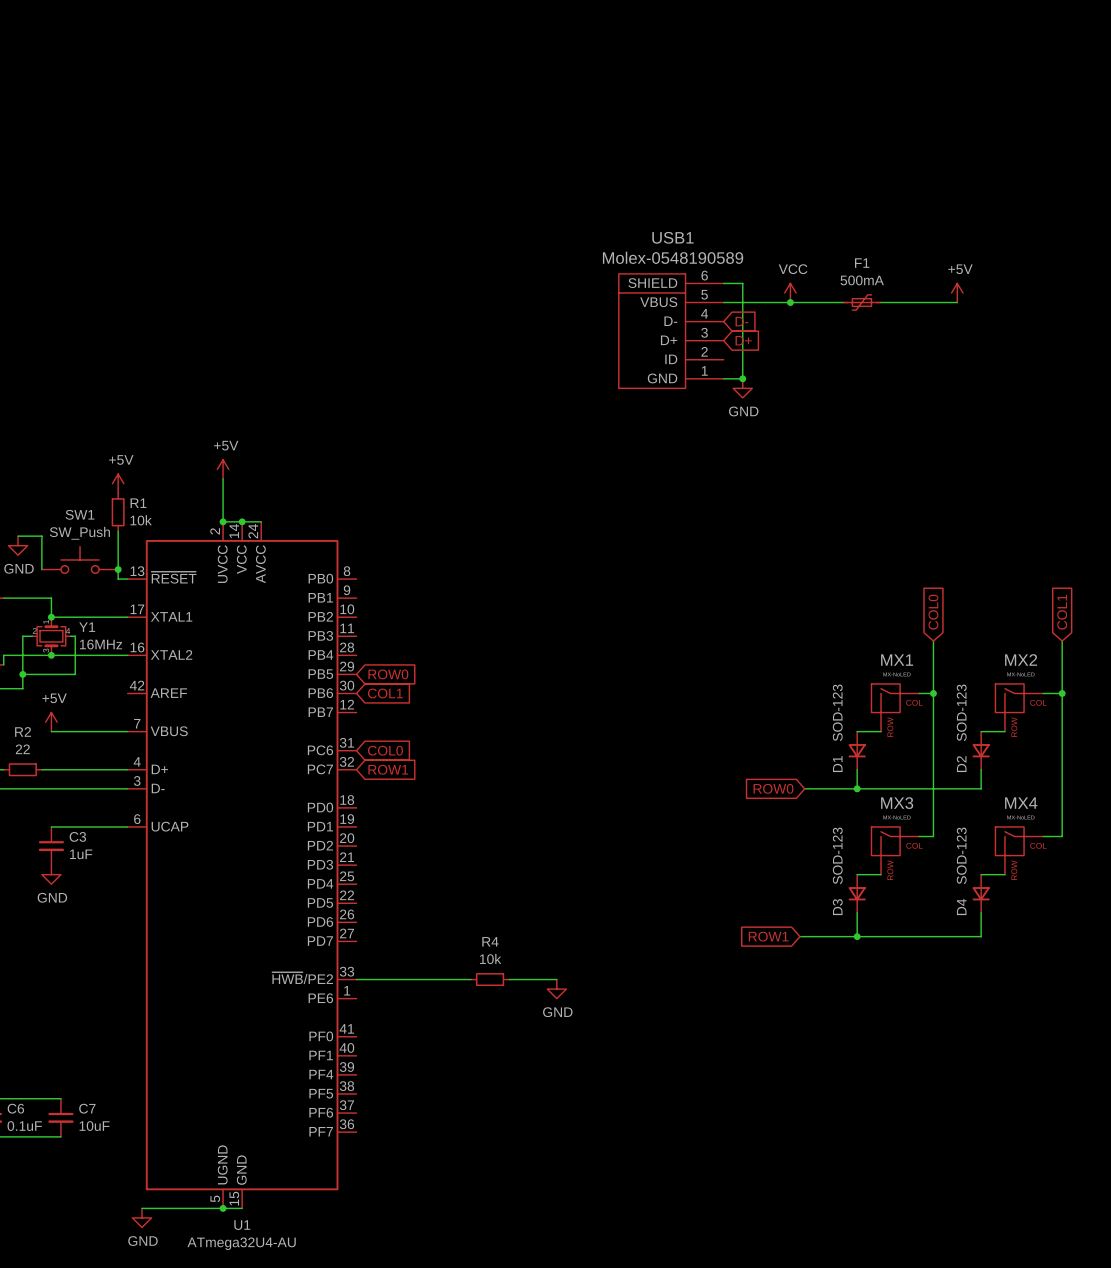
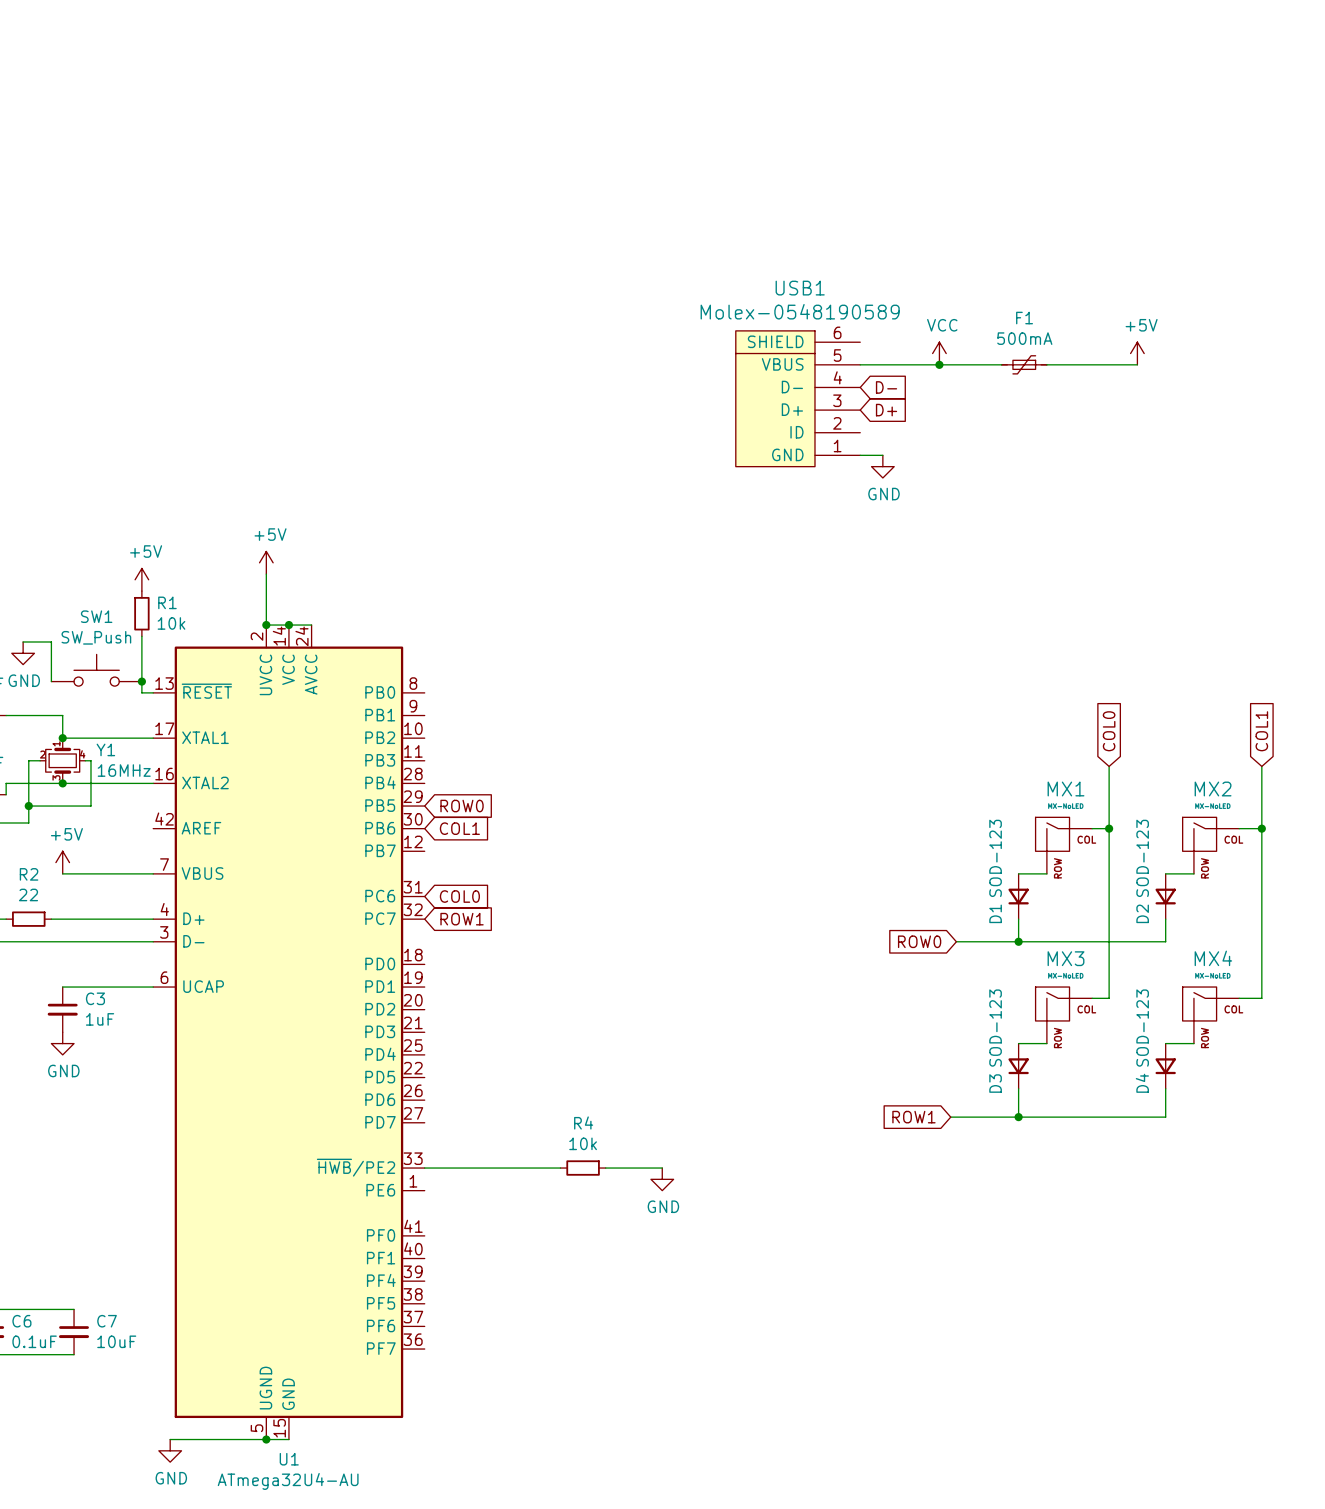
wire: (723, 283) (742, 283) (742, 378) -> none
junction: (742, 378) -> none

